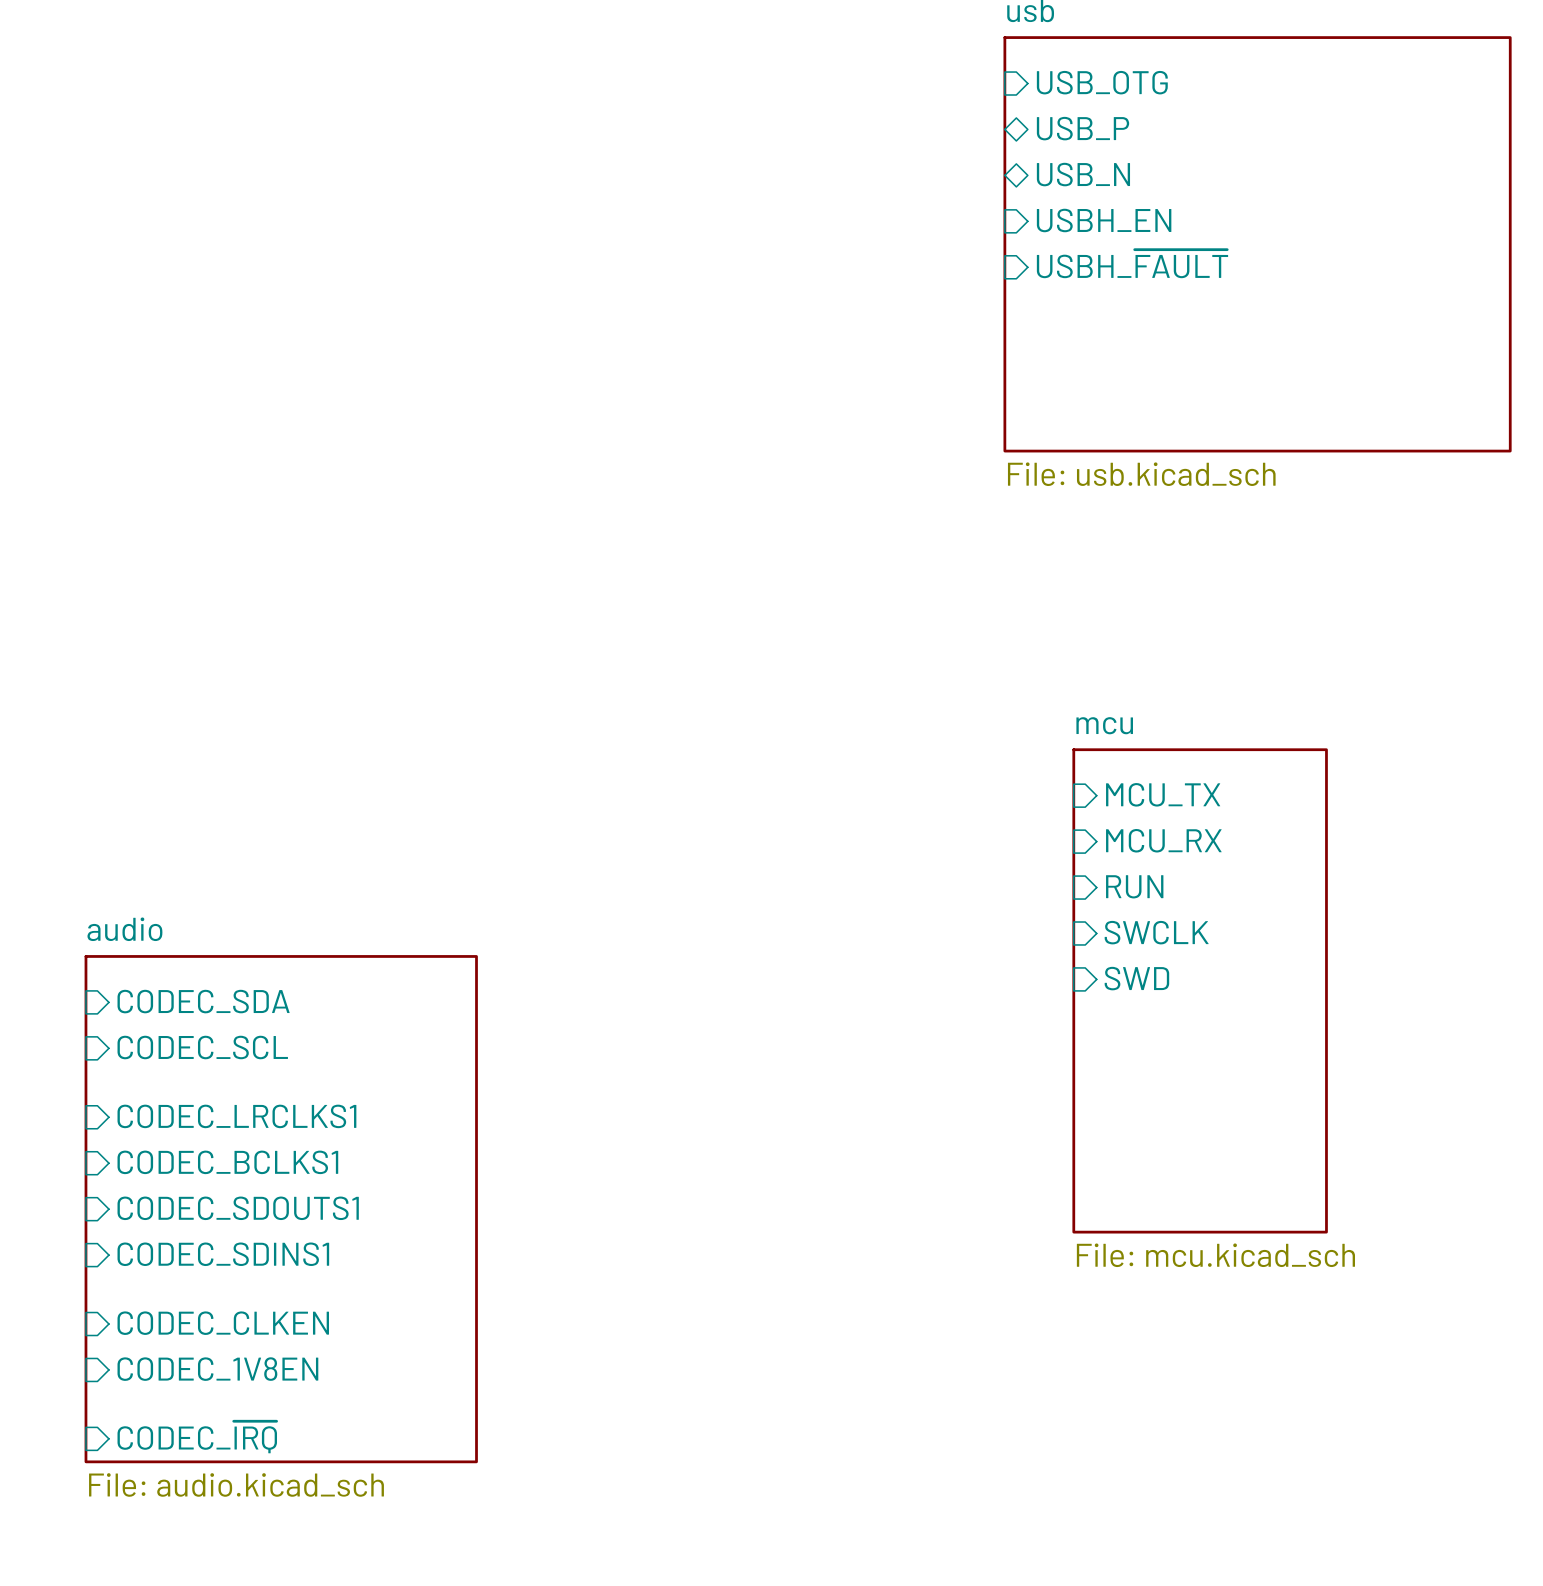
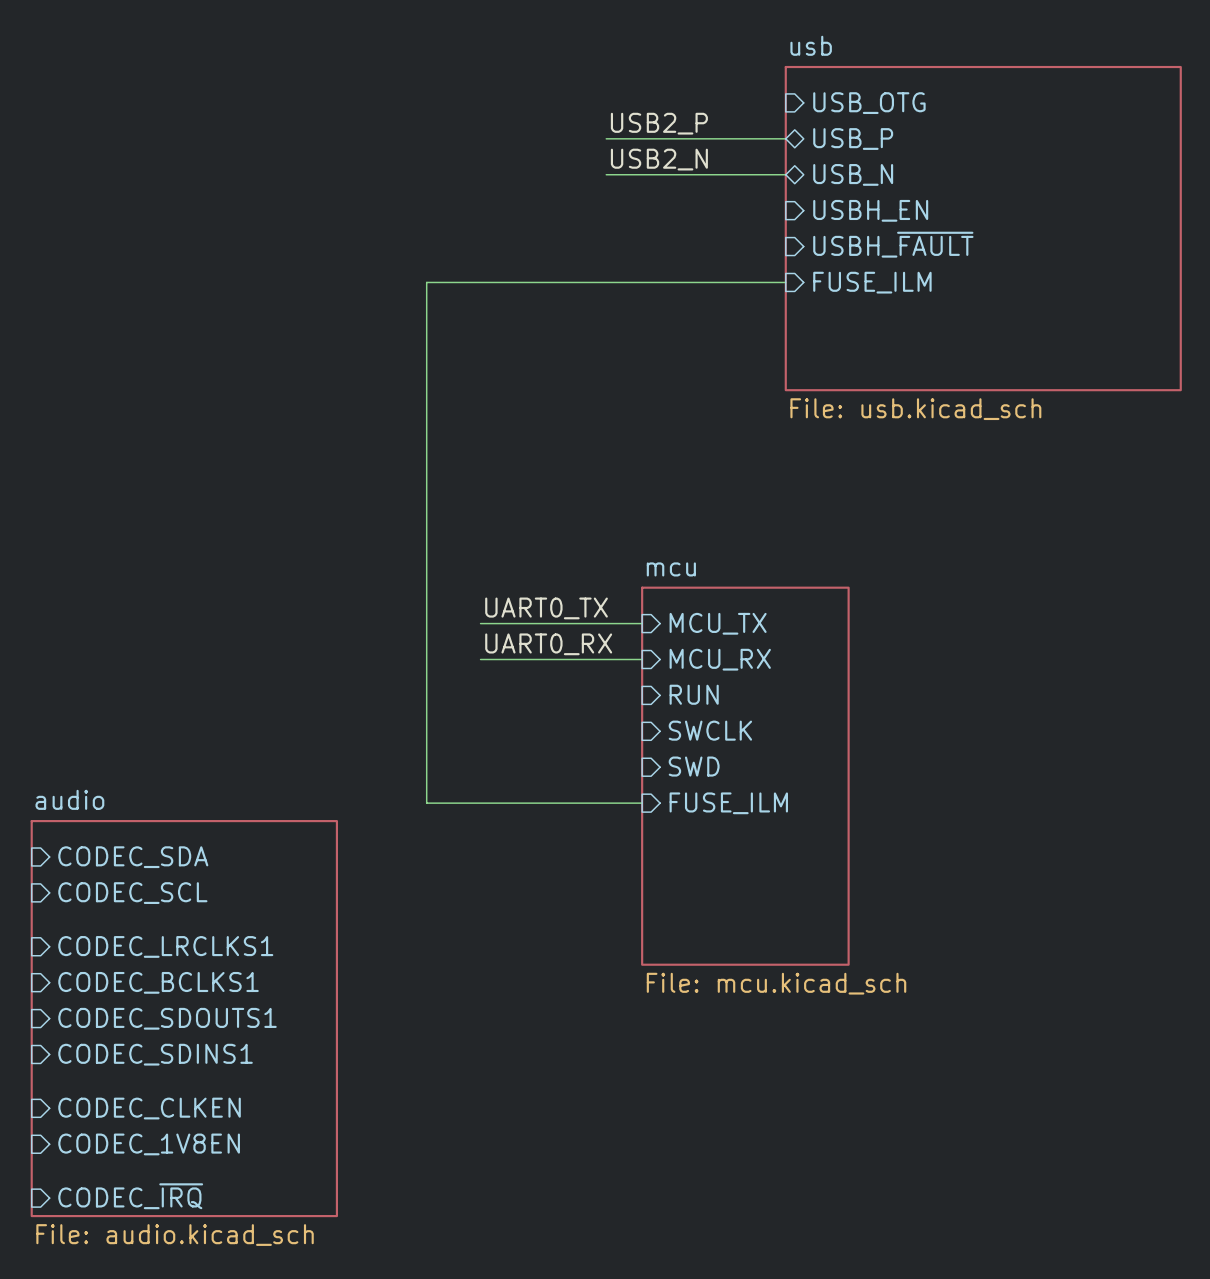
label: none -> USB2_P (659, 123)
wire: none -> (606, 138) (785, 138)
label: none -> USB2_N (659, 159)
wire: none -> (606, 174) (785, 174)
sheet pin: none -> FUSE_ILM (872, 282)
wire: none -> (785, 282) (426, 282) (426, 803) (642, 803)
label: none -> UART0_TX (546, 608)
wire: none -> (480, 623) (642, 623)
label: none -> UART0_RX (548, 644)
sheet pin position: MCU_TX (1163, 794) -> MCU_TX (718, 623)
wire: none -> (480, 659) (642, 659)
sheet pin position: MCU_RX (1163, 840) -> MCU_RX (720, 659)
sheet pin position: RUN (1134, 886) -> RUN (694, 694)
sheet pin position: SWCLK (1156, 932) -> SWCLK (710, 730)
sheet mcu: none -> File: mcu.kicad_sch (745, 776)
sheet pin: none -> FUSE_ILM (728, 803)
sheet pin position: SWD (1136, 978) -> SWD (694, 766)
sheet mcu: File: mcu.kicad_sch (1200, 990) -> none
sheet pin position: CODEC_SDA (203, 1001) -> CODEC_SDA (133, 857)
sheet pin position: CODEC_SCL (202, 1047) -> CODEC_SCL (132, 893)
sheet pin position: CODEC_LRCLKS1 (236, 1116) -> CODEC_LRCLKS1 (165, 946)
sheet pin position: CODEC_BCLKS1 (227, 1162) -> CODEC_BCLKS1 (158, 982)
sheet pin position: CODEC_SDOUTS1 (238, 1208) -> CODEC_SDOUTS1 (167, 1018)
sheet audio position: (281, 1209) -> (184, 1018)
sheet pin position: CODEC_SDINS1 (223, 1254) -> CODEC_SDINS1 (155, 1054)
sheet pin position: CODEC_CLKEN (223, 1323) -> CODEC_CLKEN (149, 1108)
sheet pin position: CODEC_1V8EN (217, 1369) -> CODEC_1V8EN (149, 1144)
sheet pin position: CODEC_~{IRQ} (197, 1437) -> CODEC_~{IRQ} (130, 1196)

